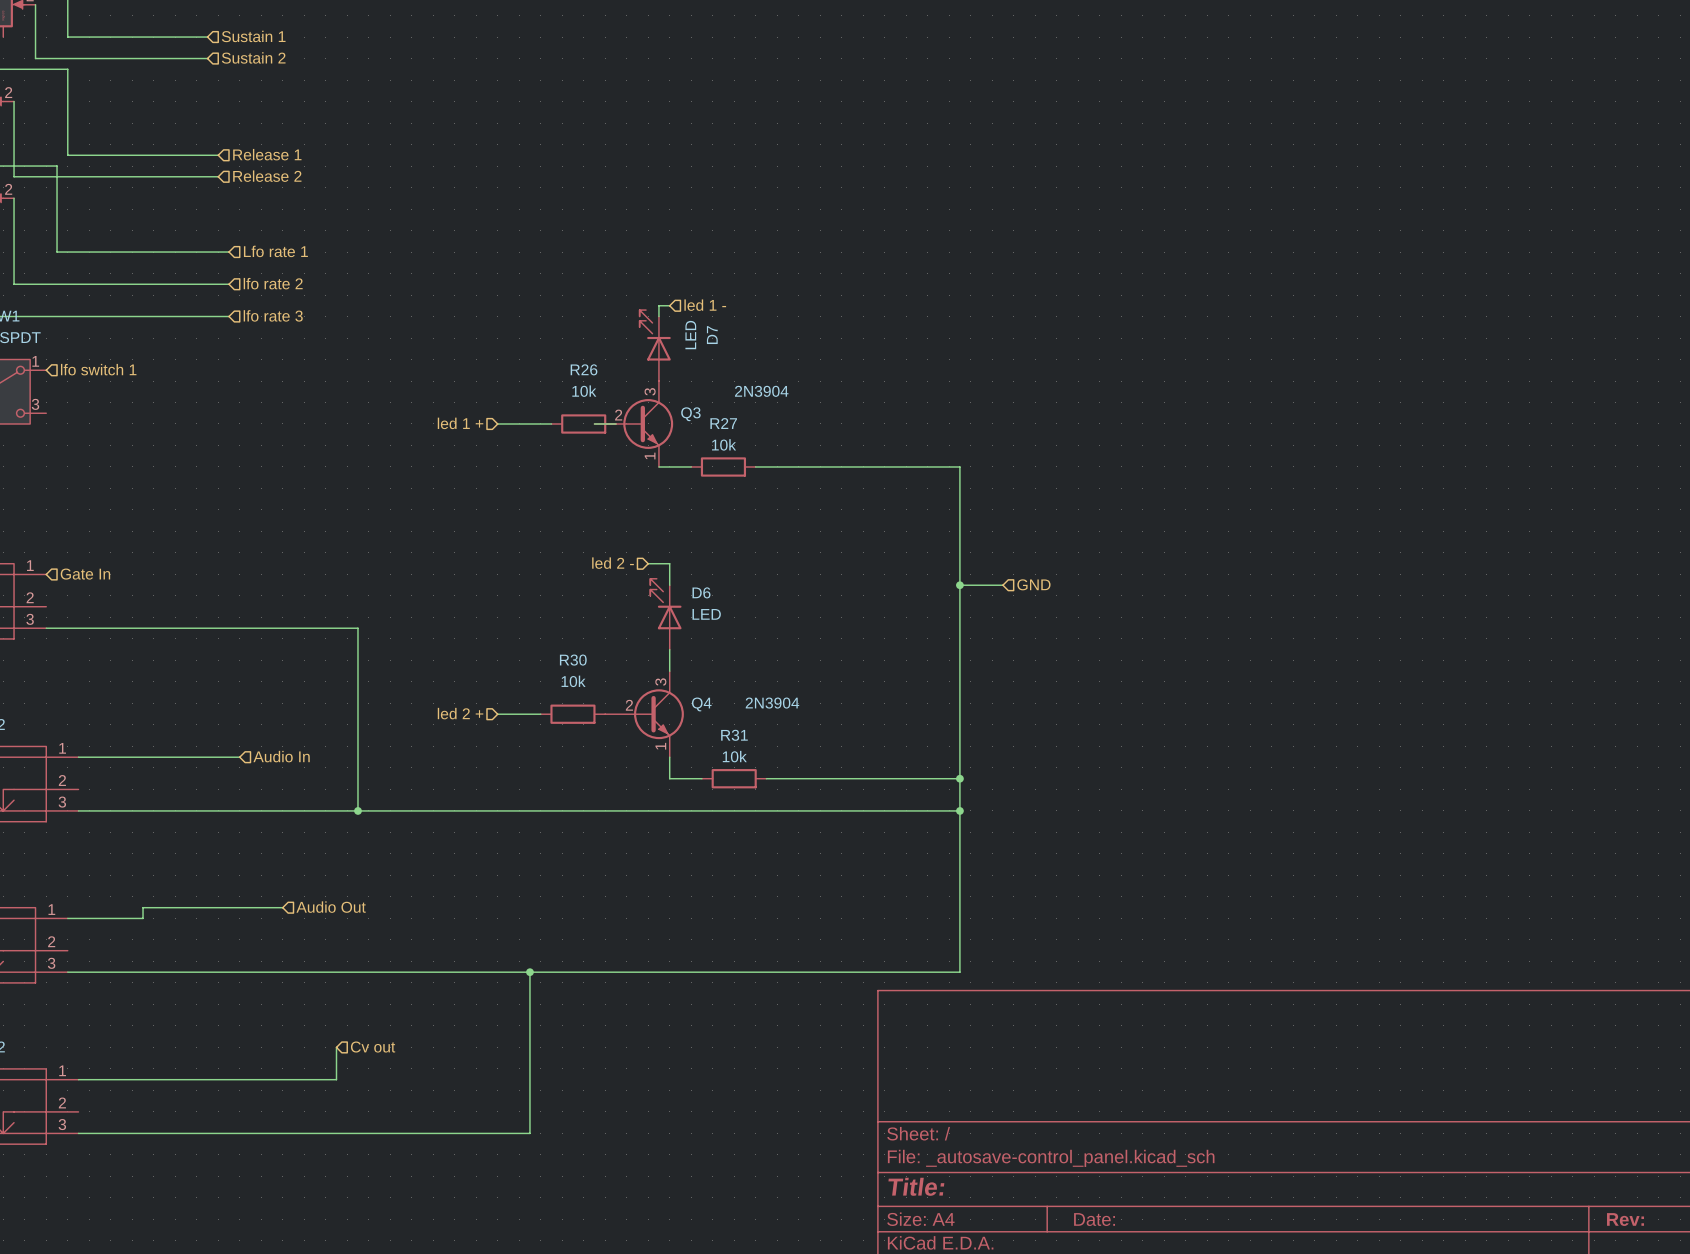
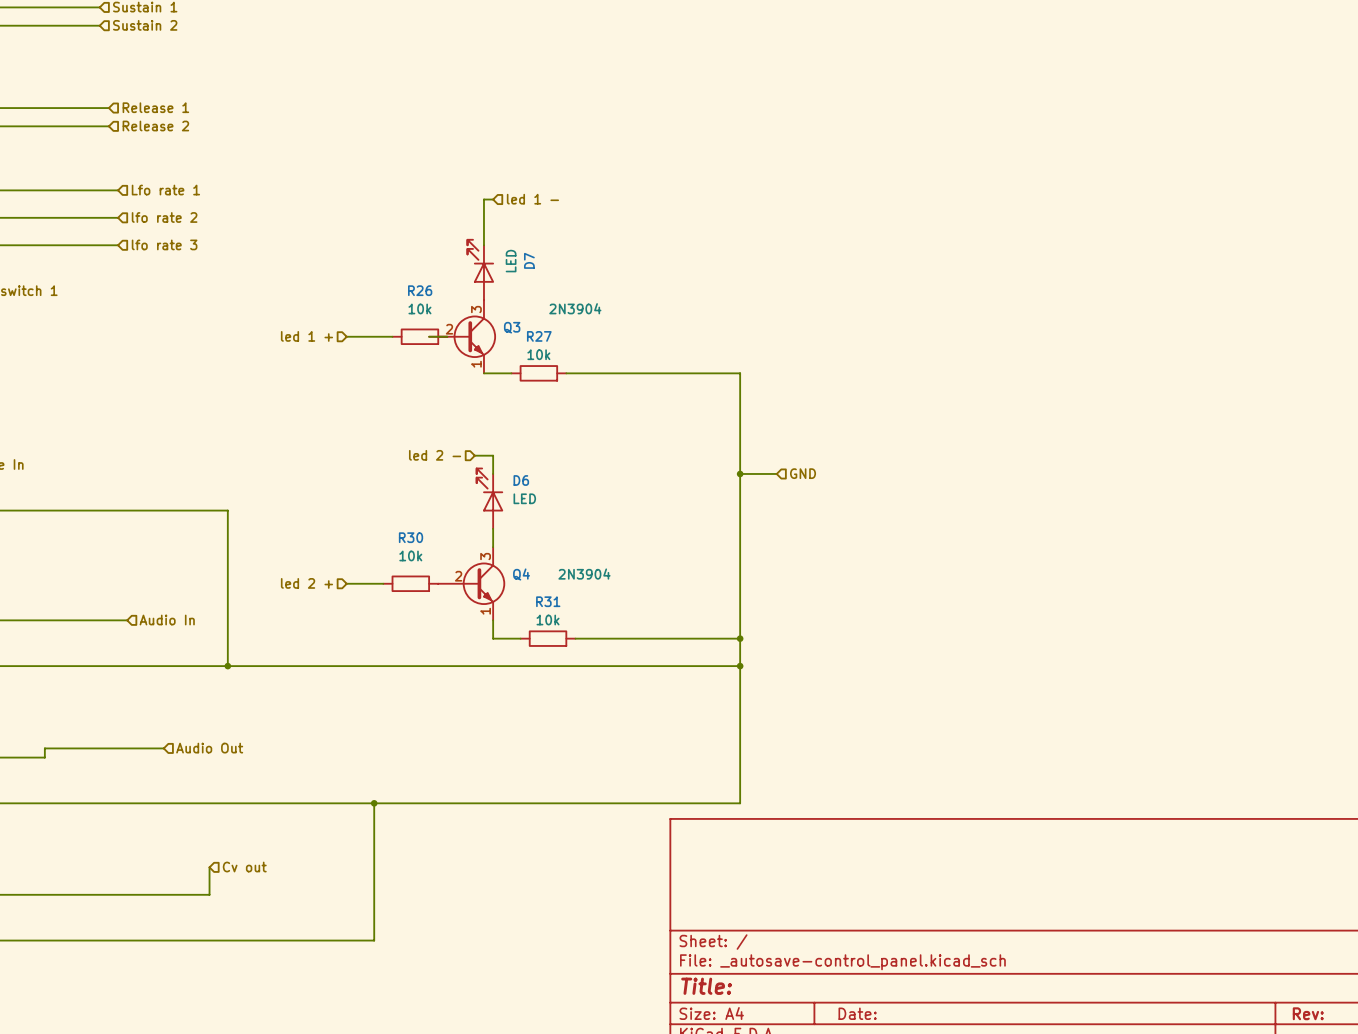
wire: (658, 305) (669, 305) -> (483, 236) (483, 199) (493, 199)
hierarchical label position: led 1 - (705, 305) -> led 1 - (532, 199)

